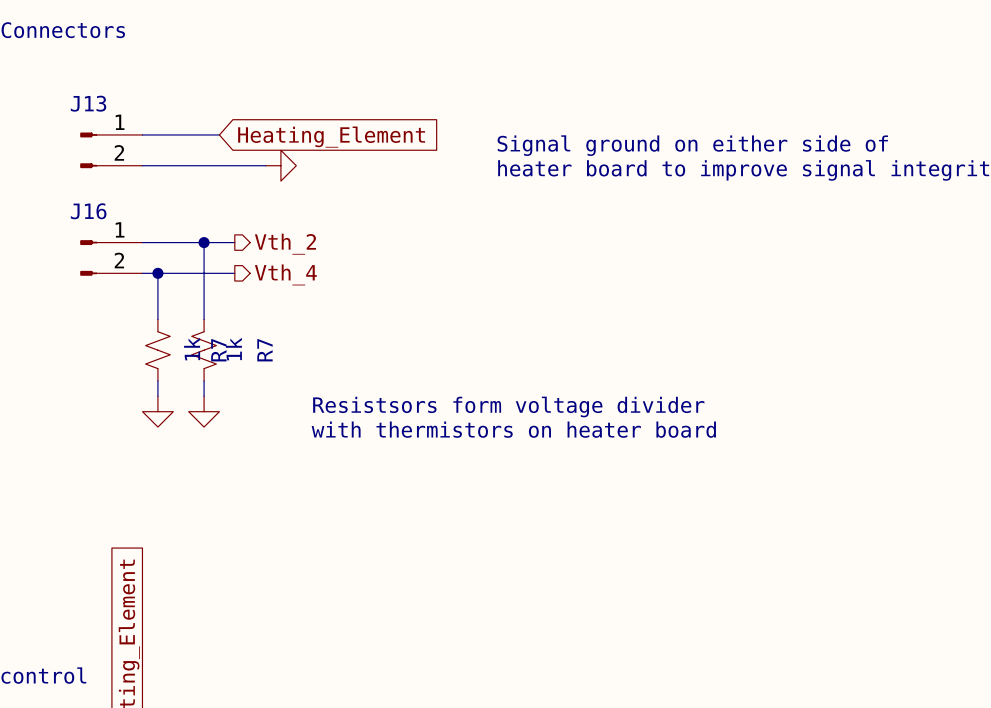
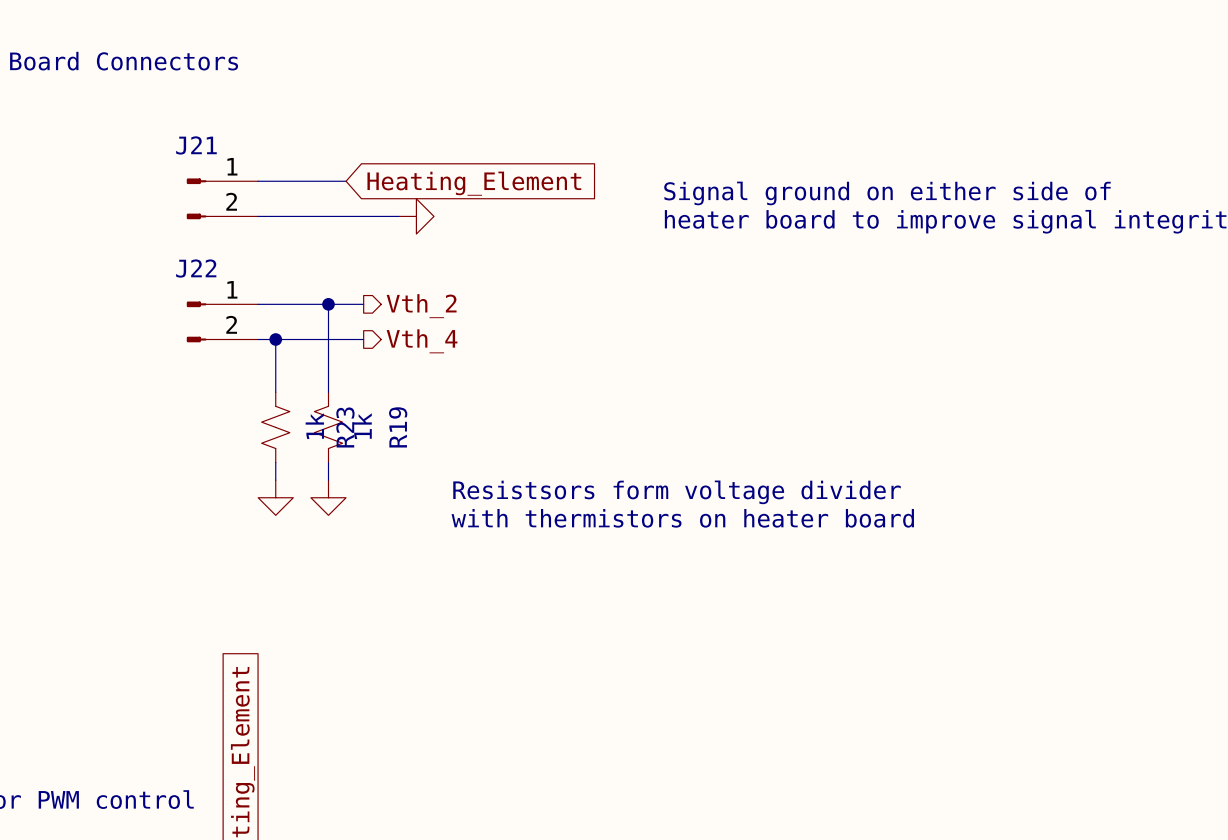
J13 name: J13 (88, 103) -> J21 (196, 145)
J16 name: J16 (88, 211) -> J22 (196, 268)
R7 name: R7 (218, 350) -> R23 (345, 427)
R7 name: R7 (264, 350) -> R19 (398, 427)

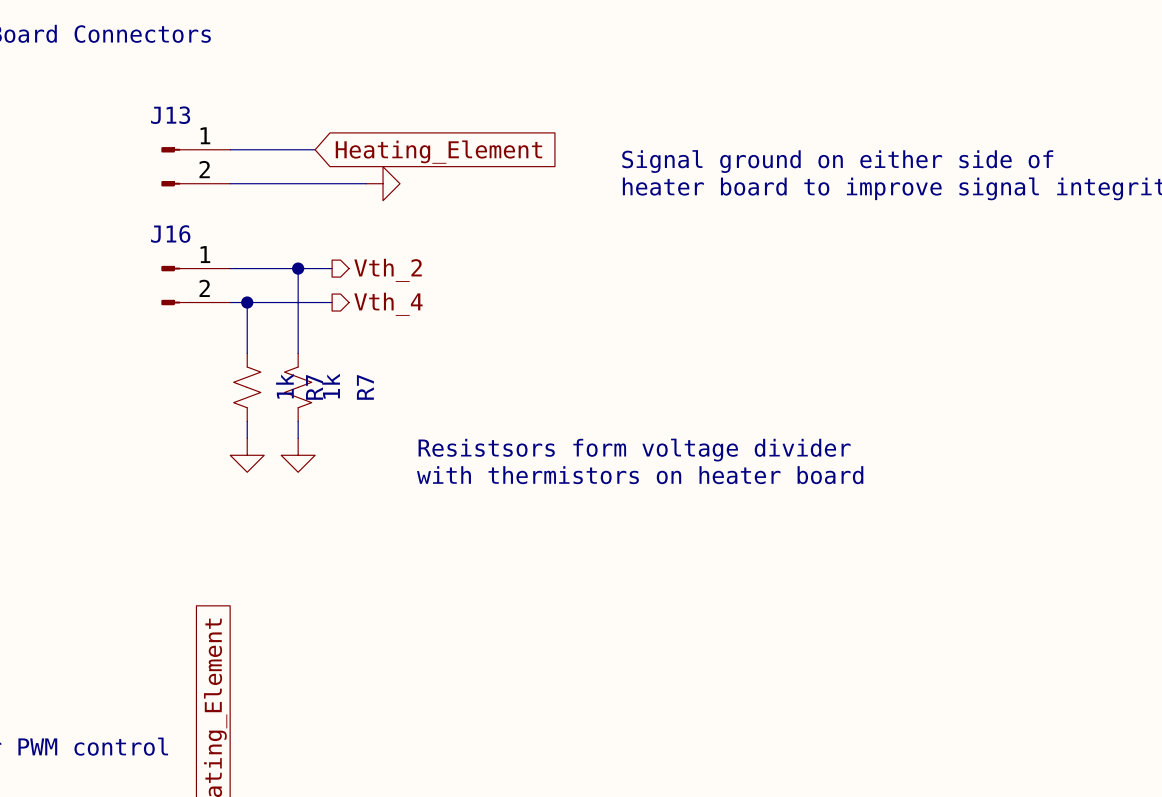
J21 name: J21 (196, 145) -> J13 (170, 115)
J22 name: J22 (196, 268) -> J16 (170, 234)
R23 name: R23 (345, 427) -> R7 (314, 387)
R19 name: R19 (398, 427) -> R7 (365, 387)

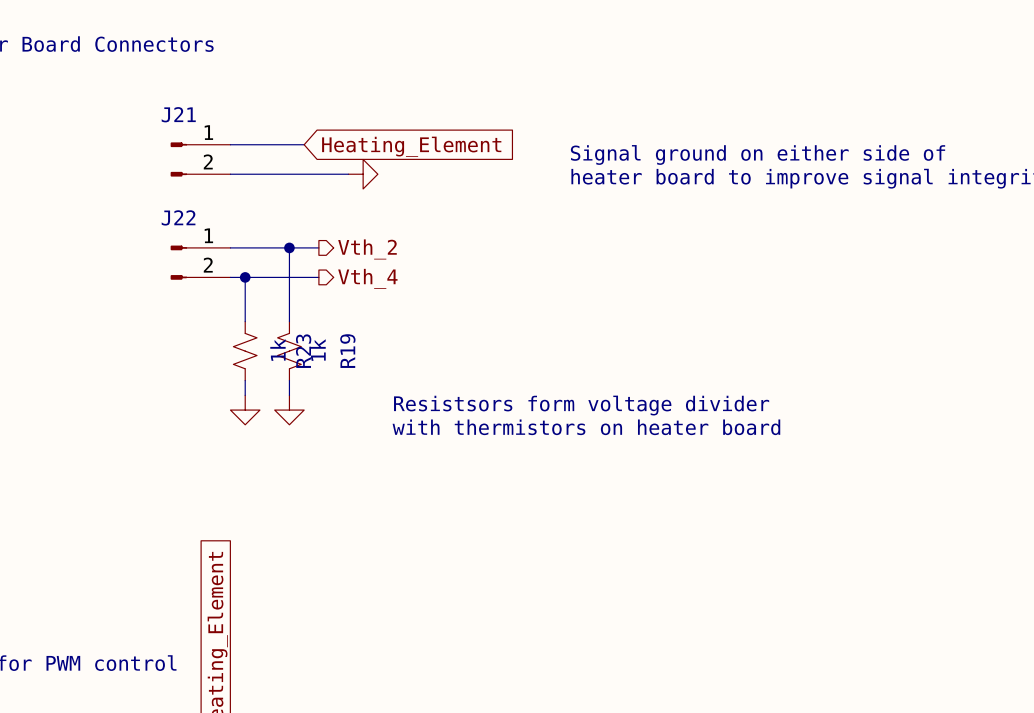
J13 name: J13 (170, 115) -> J21 (178, 114)
J16 name: J16 (170, 234) -> J22 (178, 217)
R7 name: R7 (314, 387) -> R23 (303, 351)
R7 name: R7 (365, 387) -> R19 (347, 351)

